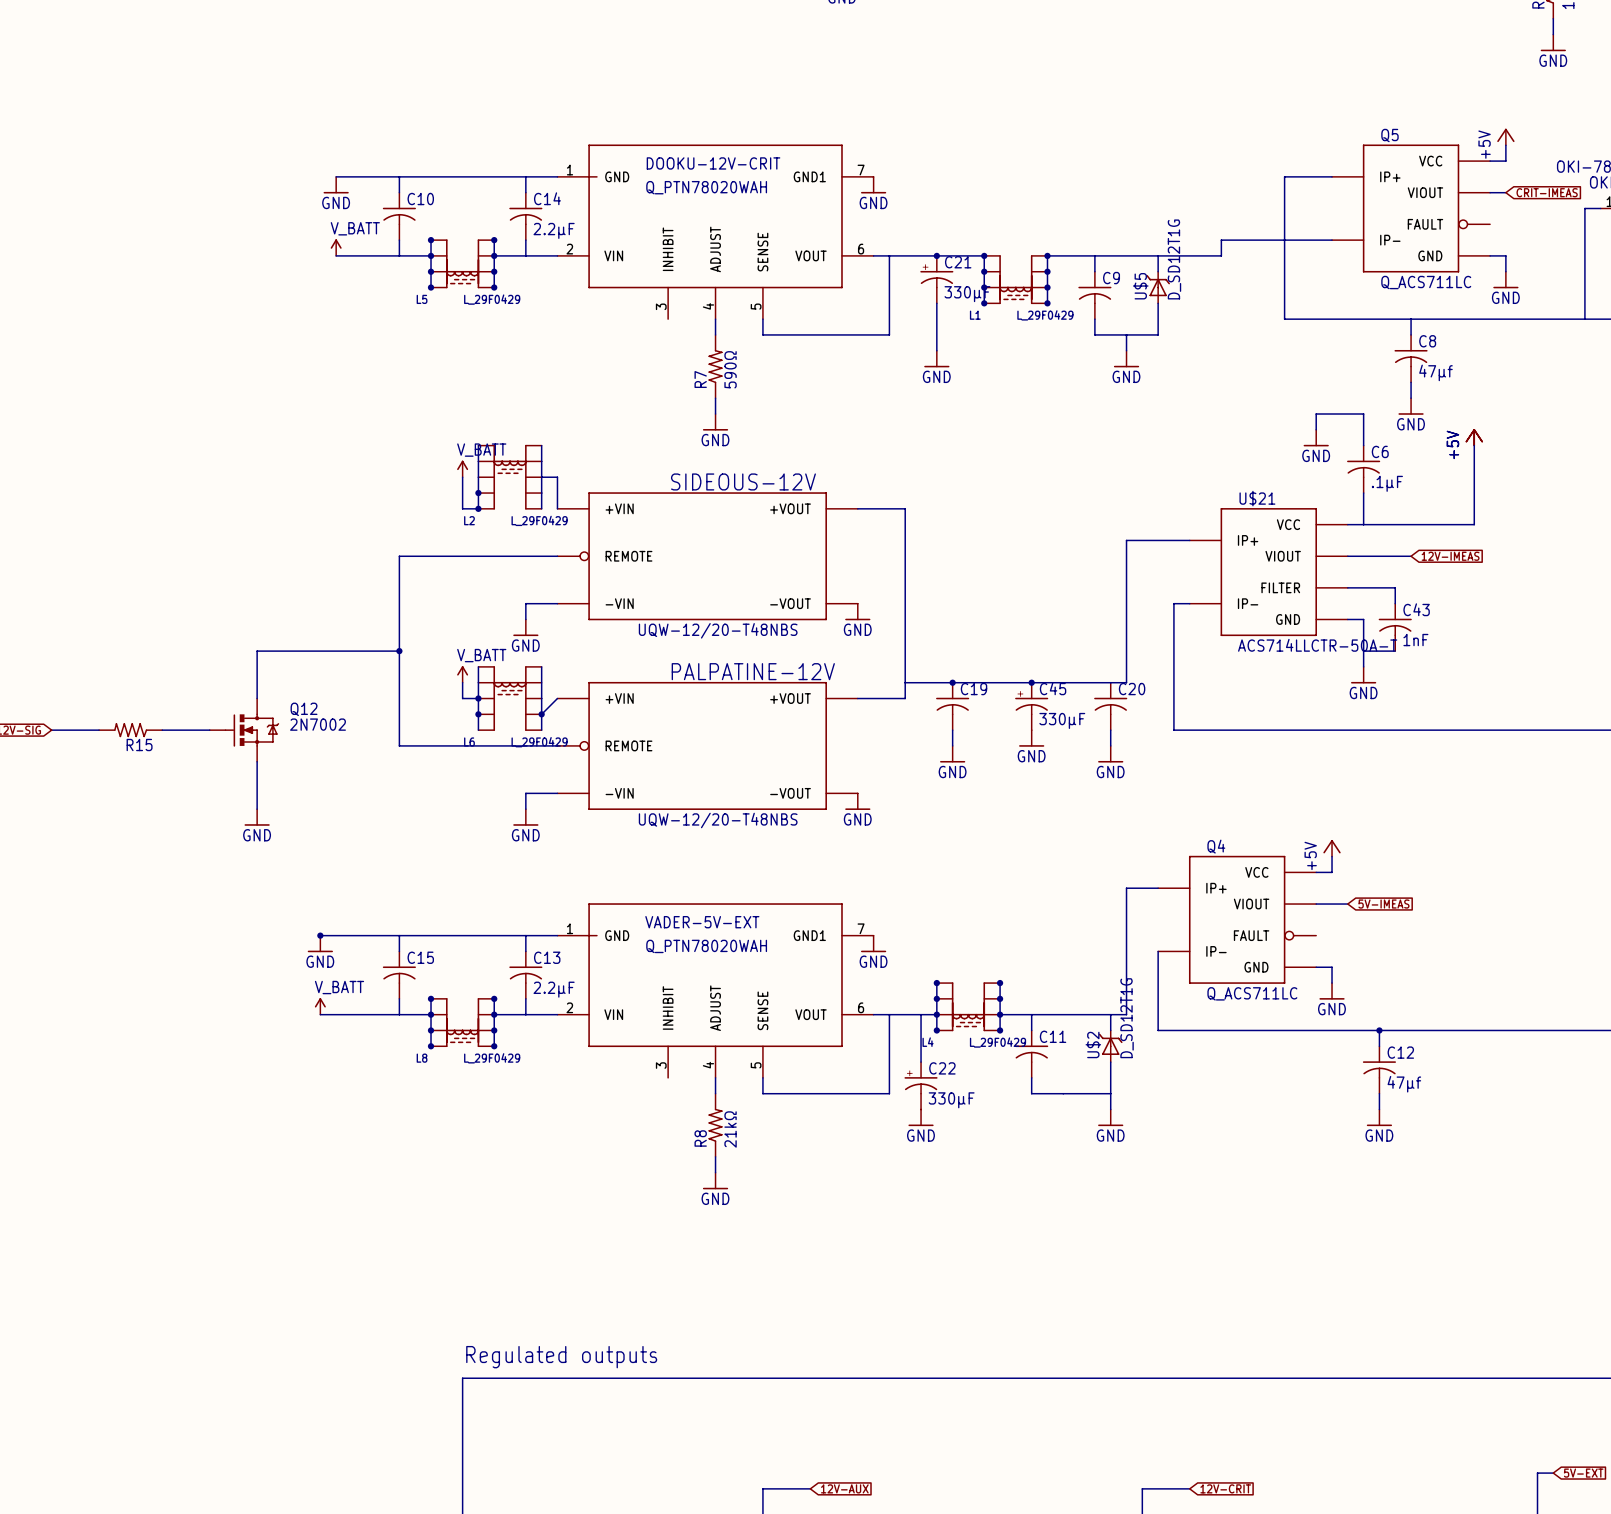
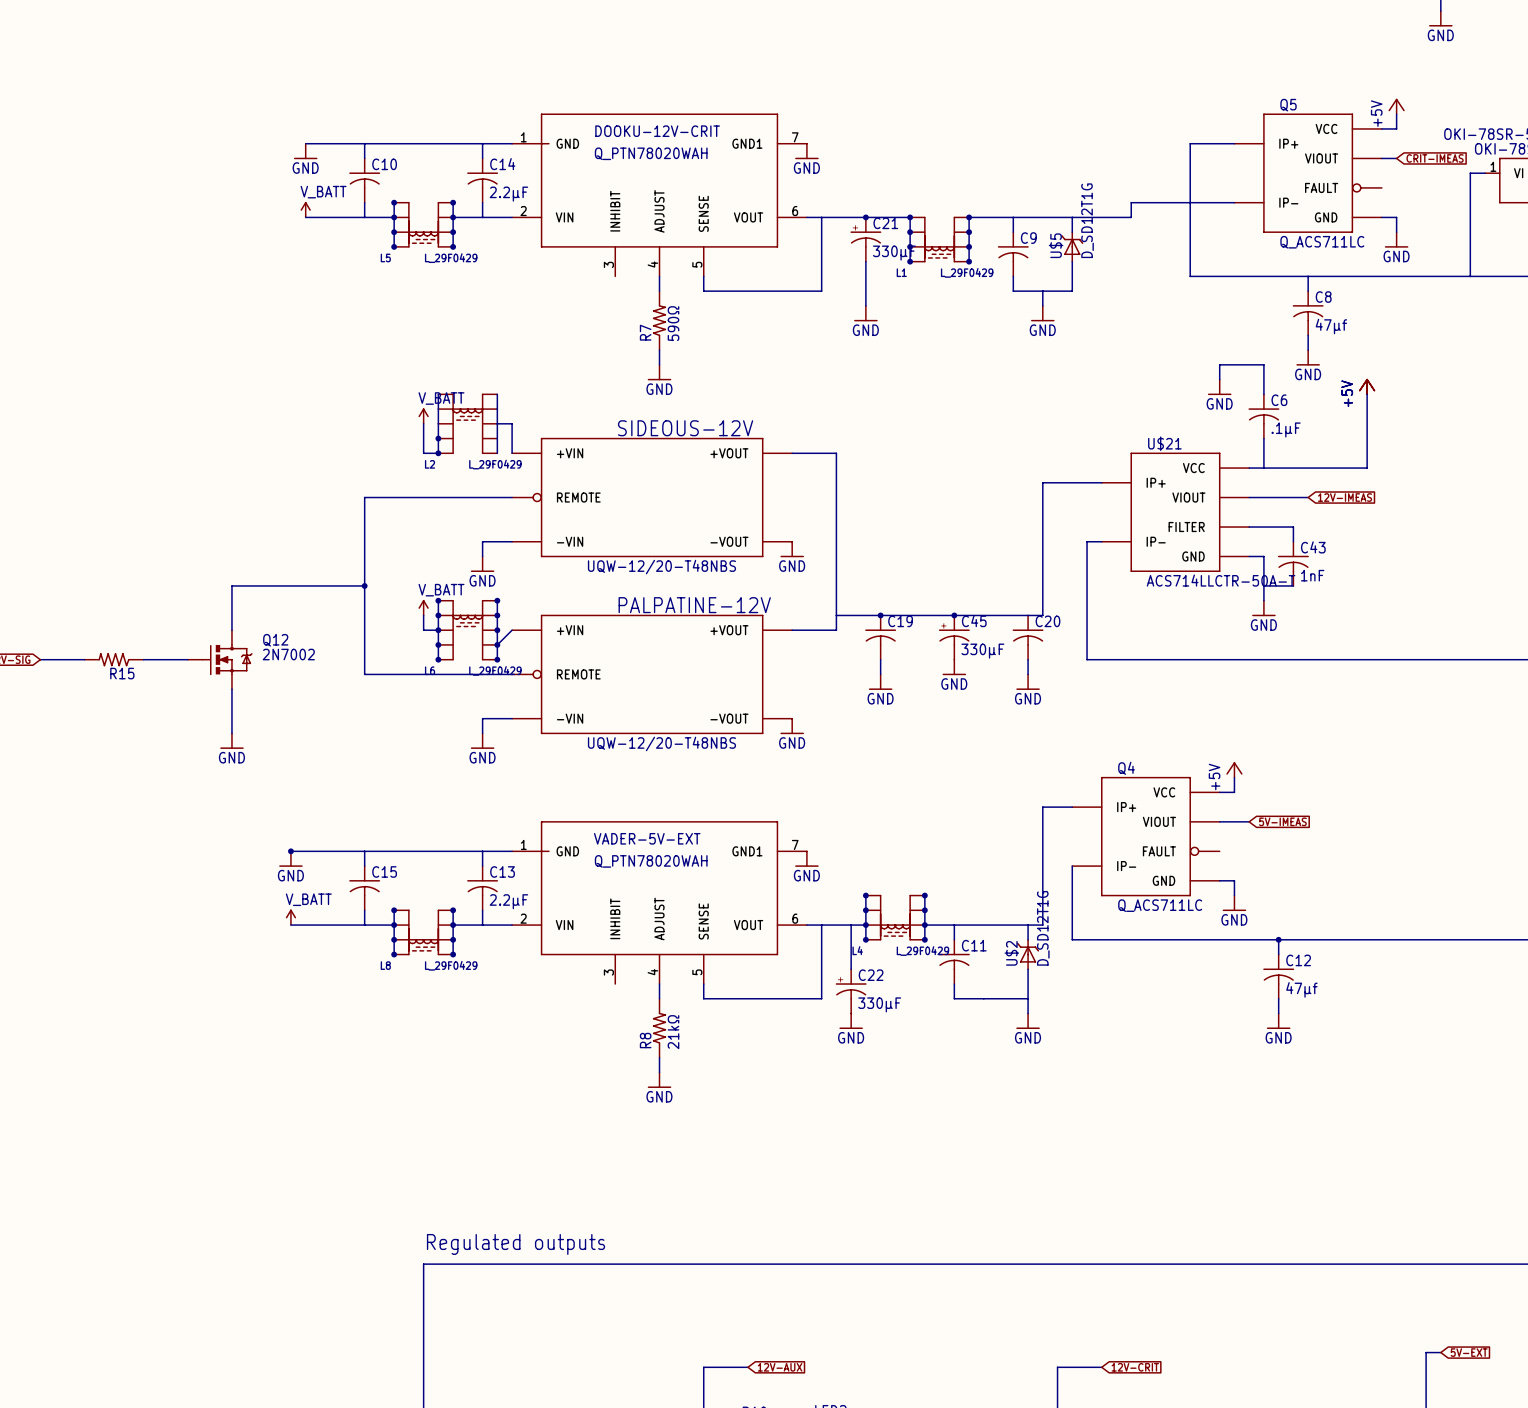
junction: none -> (438, 600)
junction: none -> (497, 600)
junction: none -> (438, 615)
junction: none -> (497, 615)
junction: none -> (497, 630)
junction: none -> (438, 659)
junction: none -> (497, 659)

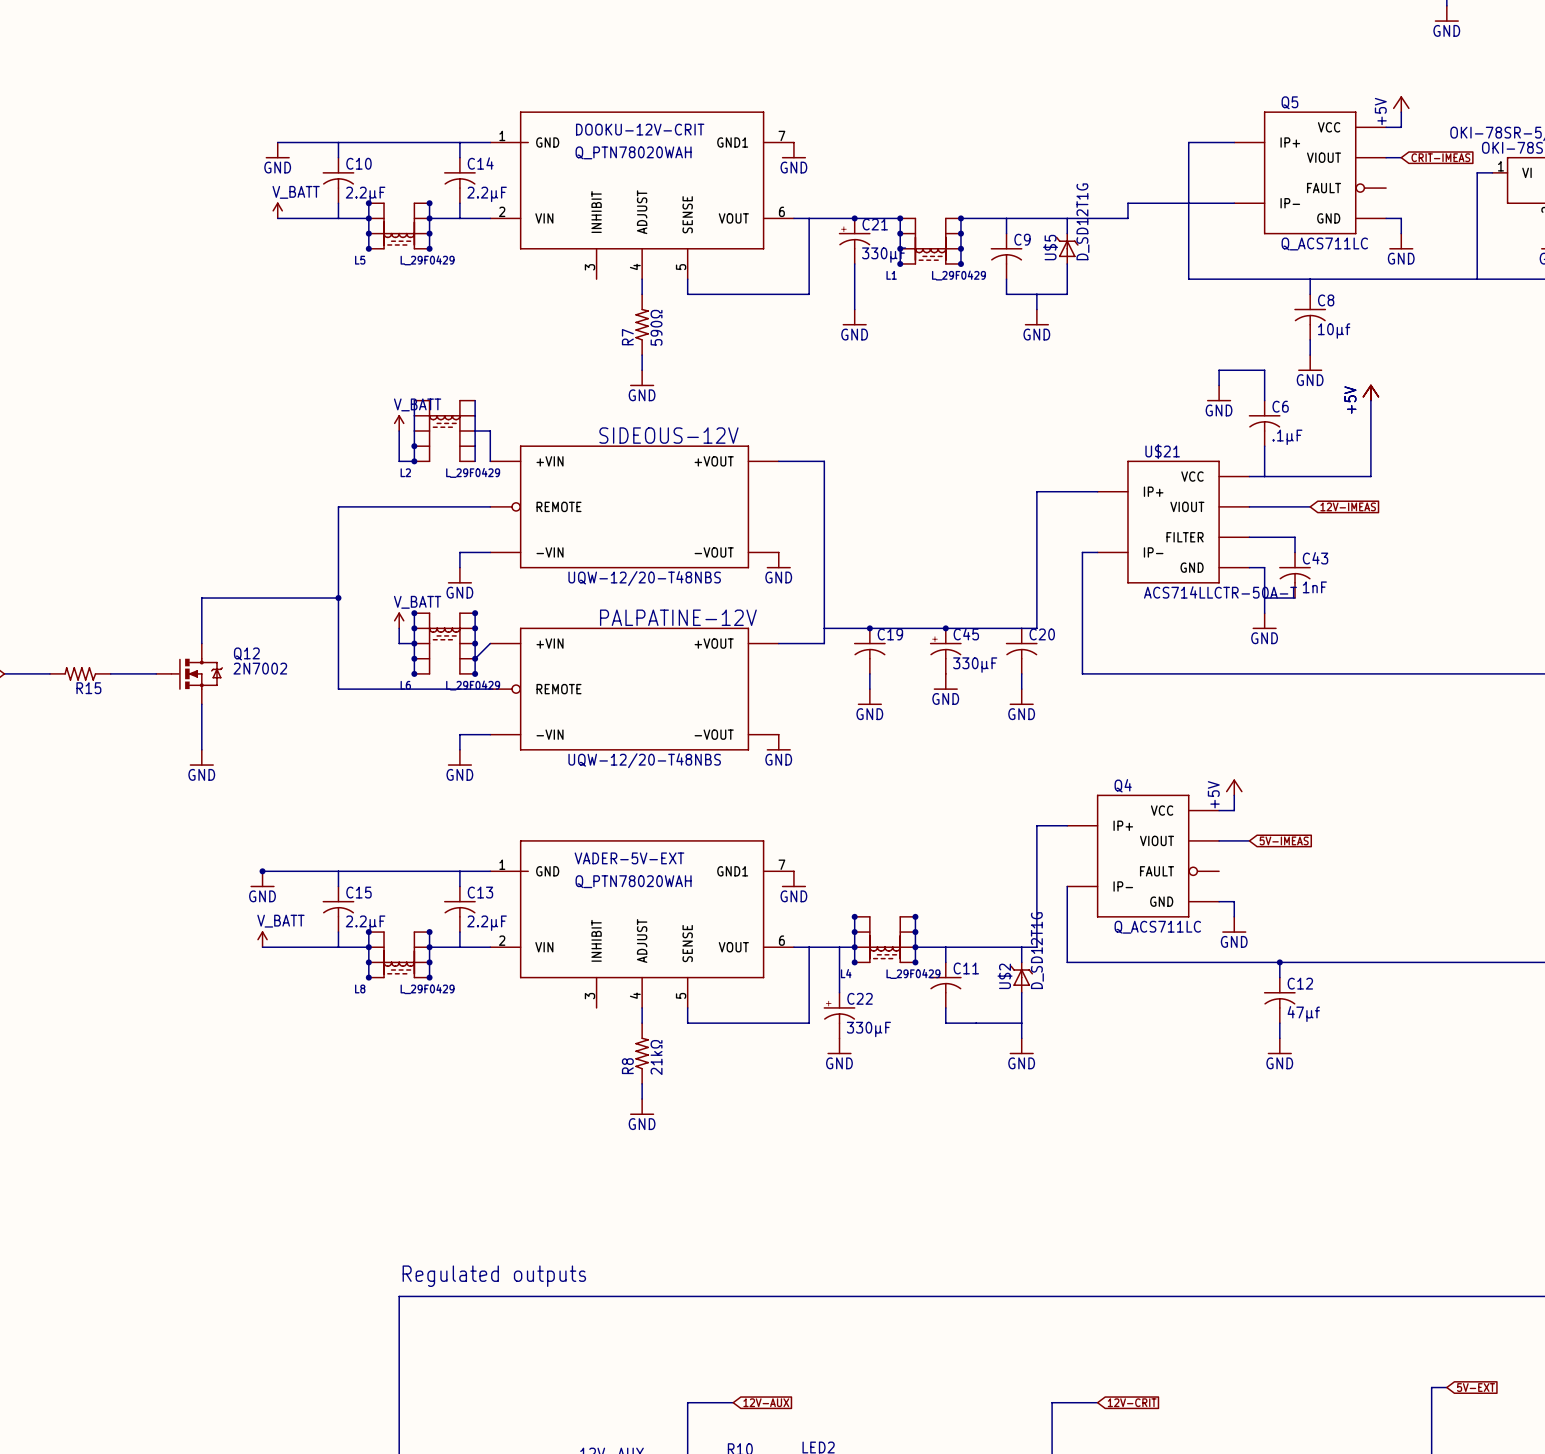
C10 value: none -> 2.2µF (365, 194)
C8 value: 47µf (1331, 326) -> 10µf (1334, 331)
C15 value: none -> 2.2µF (365, 923)

